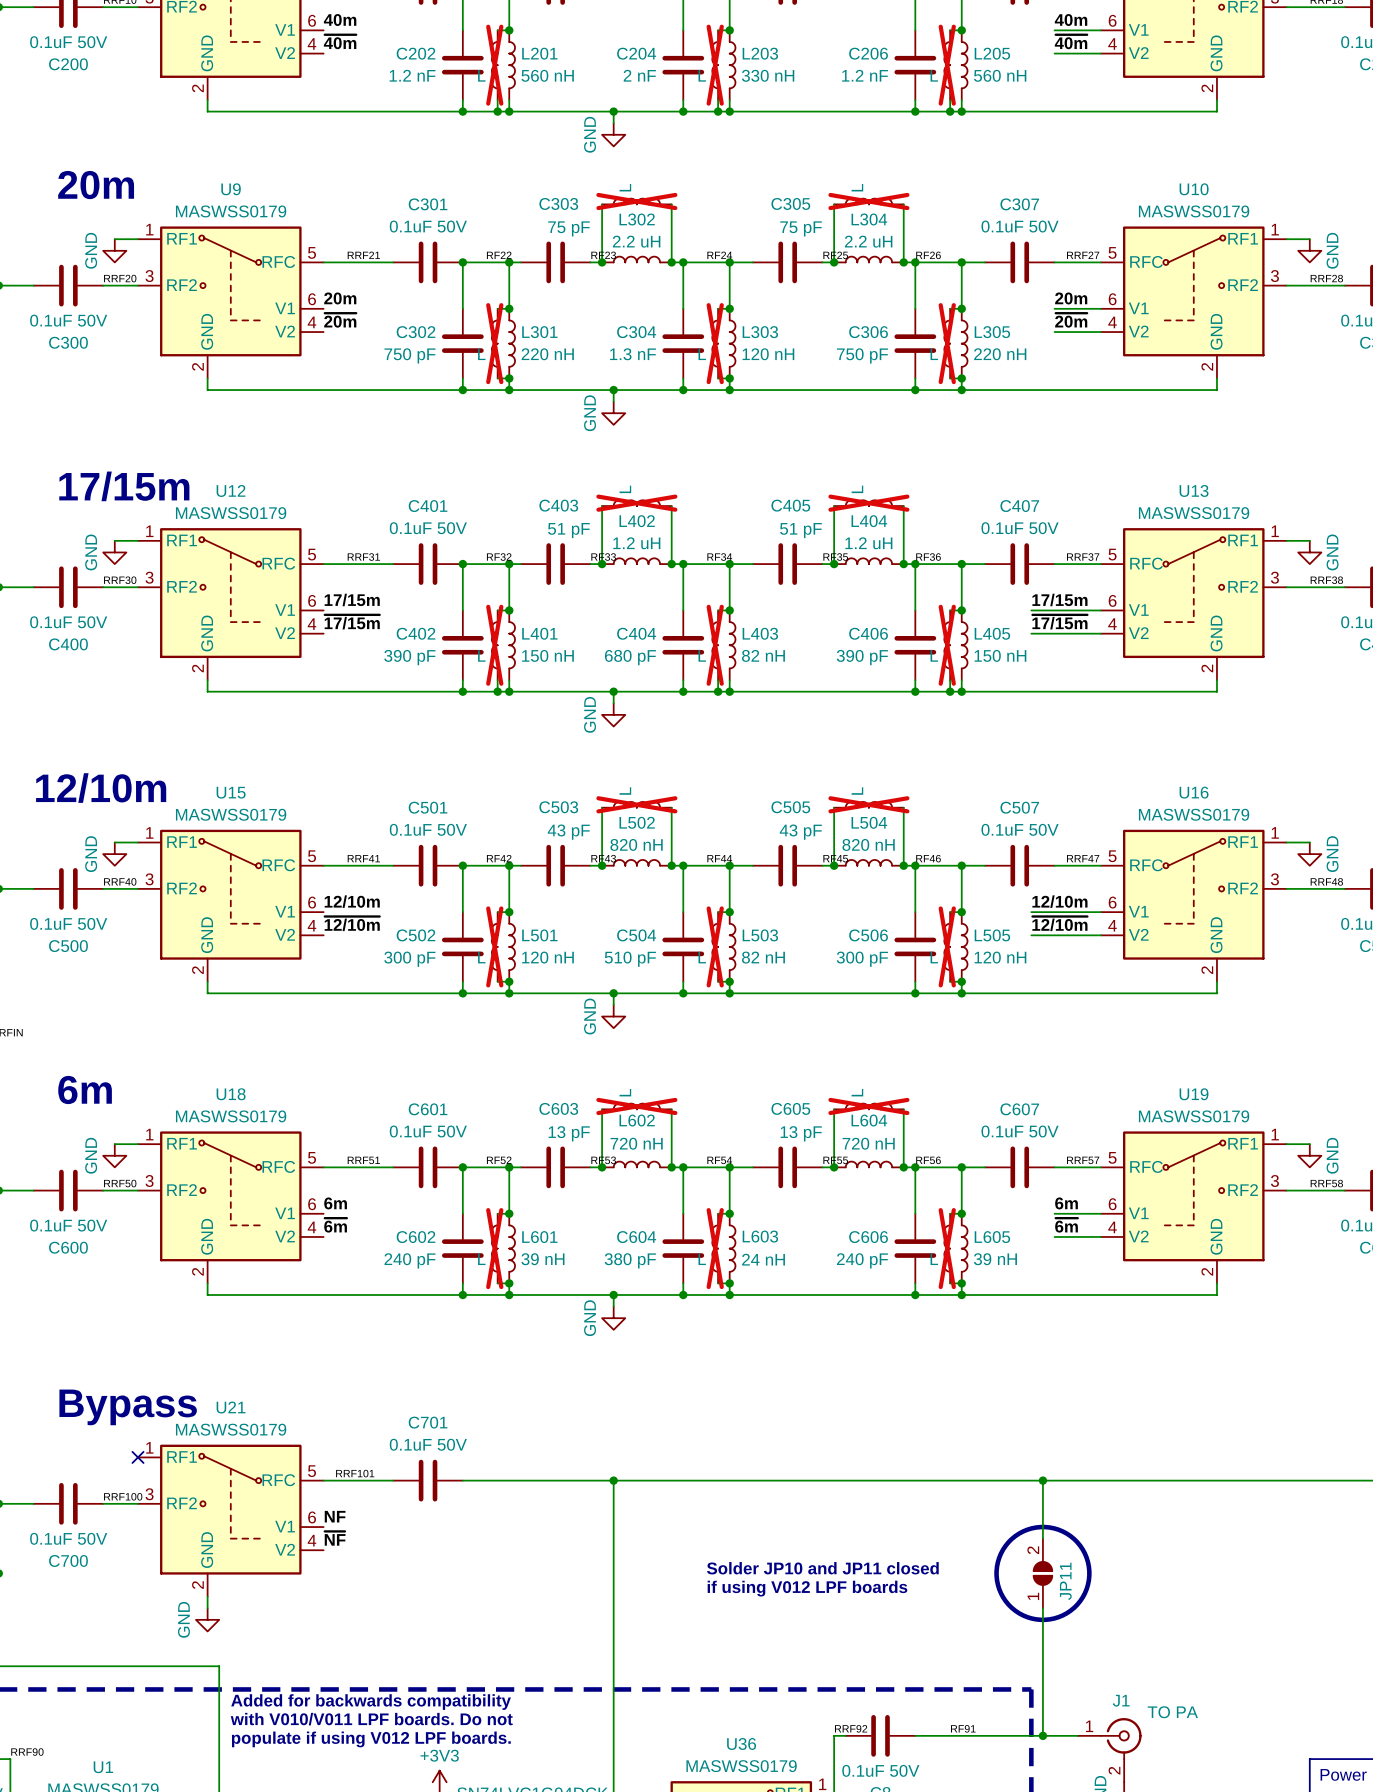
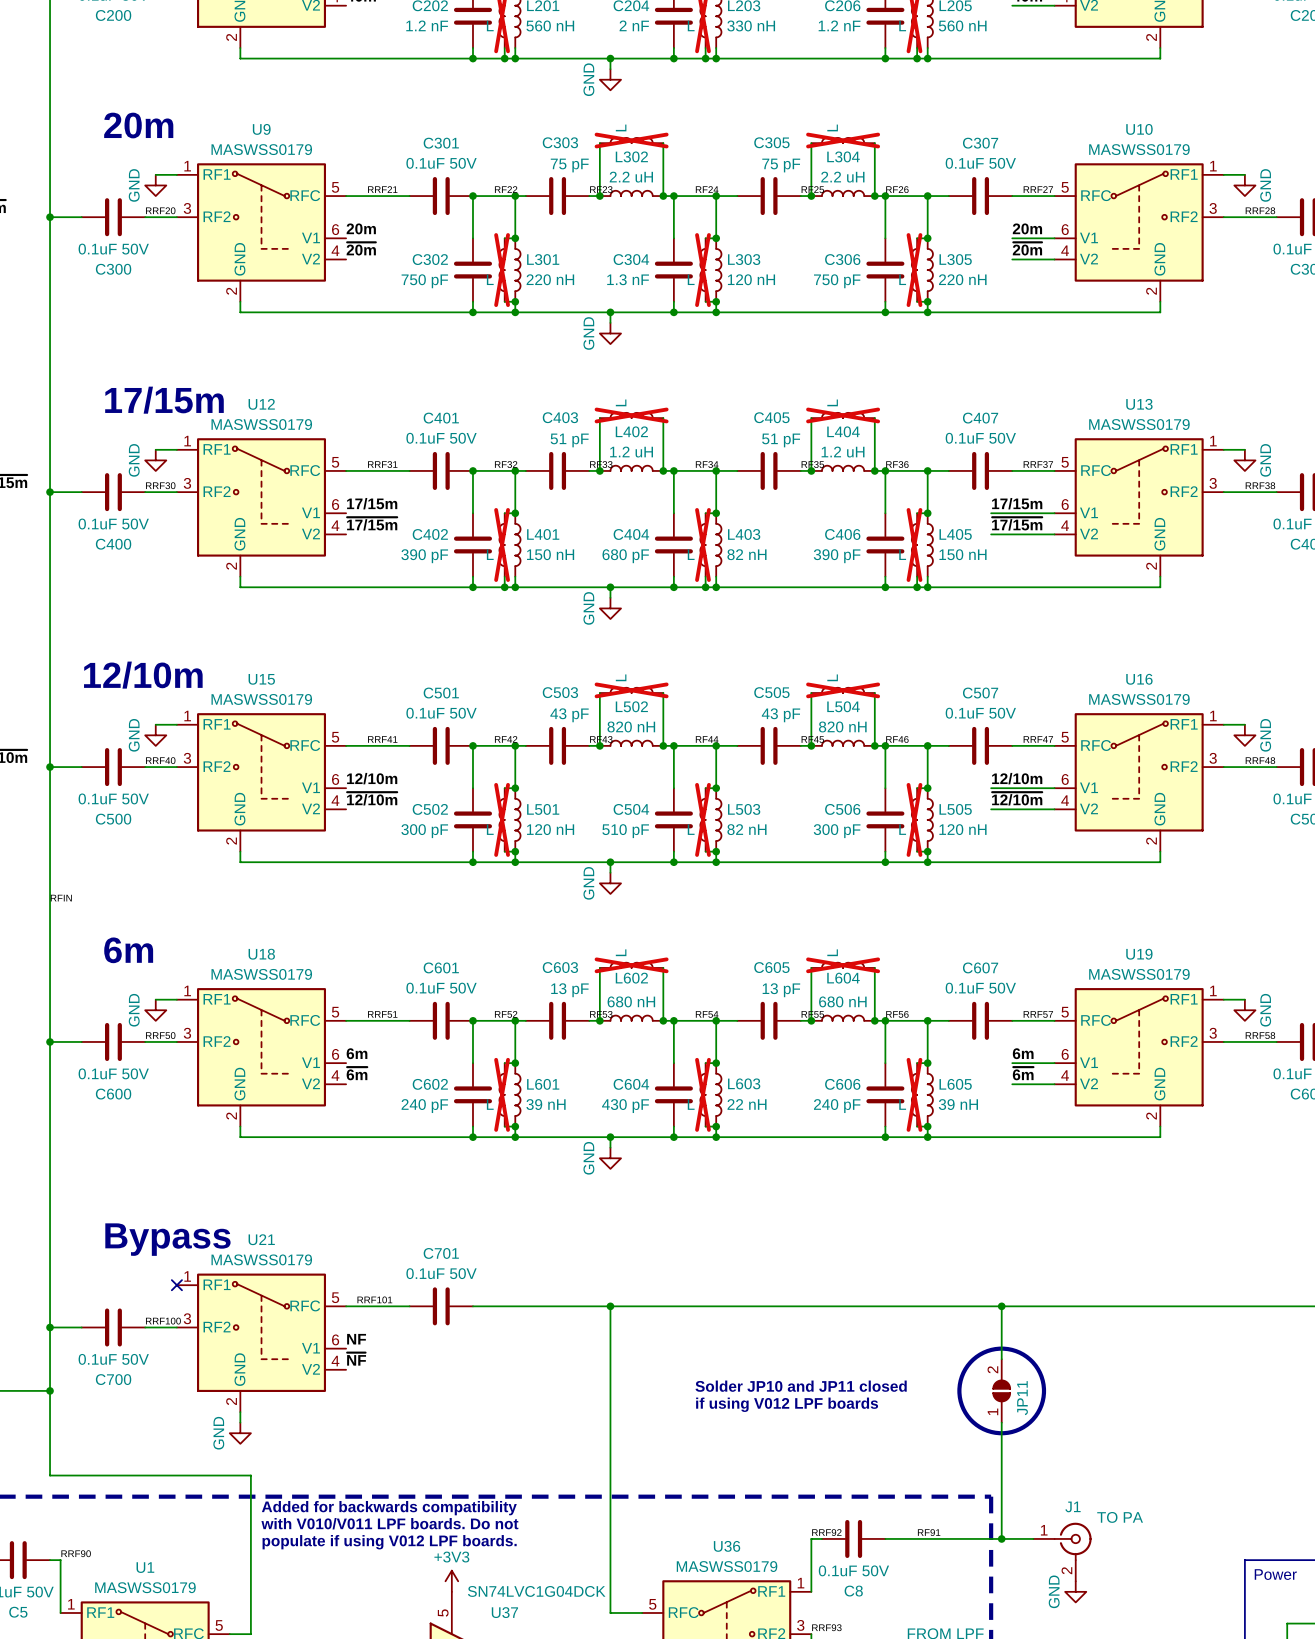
L602 value: 720 nH (636, 1143) -> 680 nH (631, 1001)
L604 value: 720 nH (868, 1143) -> 680 nH (842, 1001)
L603 value: 24 nH (763, 1259) -> 22 nH (747, 1104)
C604 value: 380 pF (630, 1260) -> 430 pF (625, 1106)

